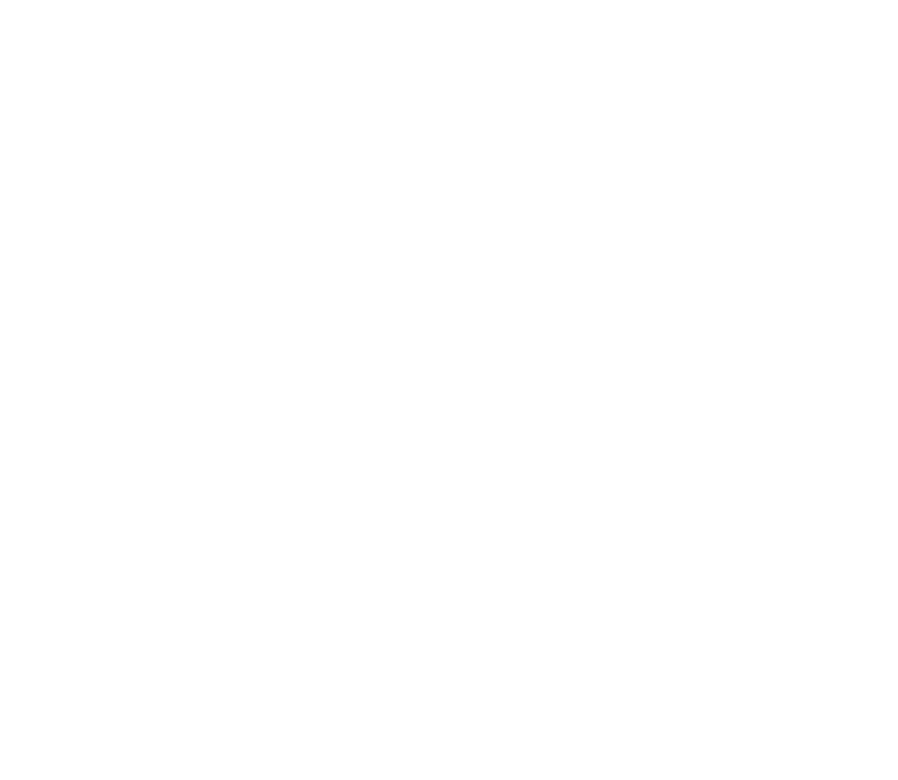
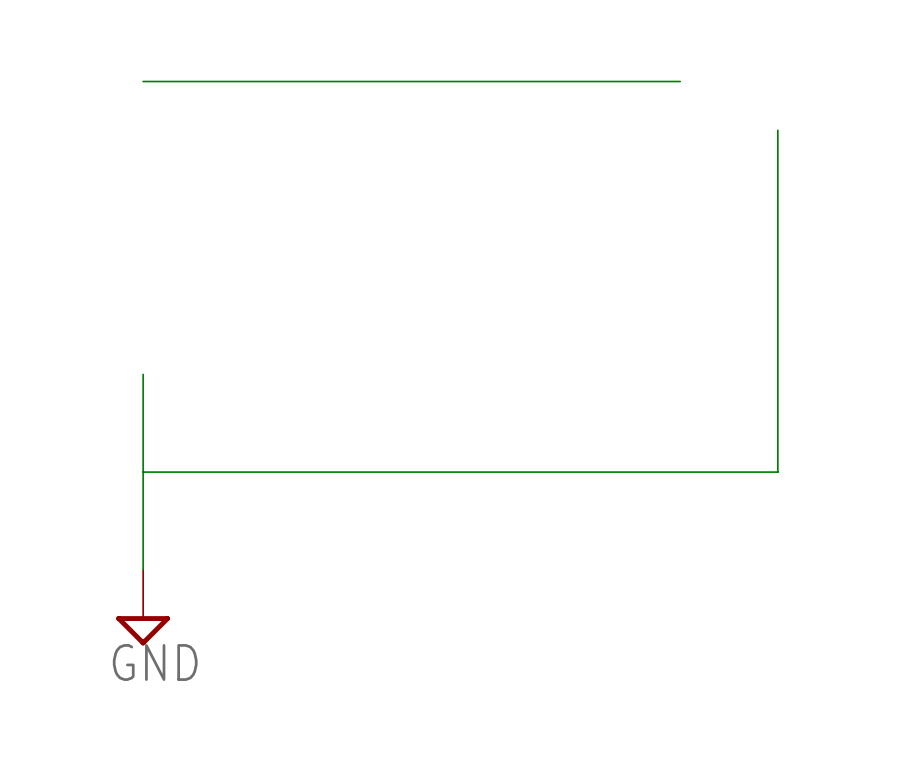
wire: none -> (143, 81) (680, 81)
wire: none -> (777, 130) (777, 472) (143, 472)
wire: none -> (143, 374) (143, 569)
power symbol: none -> GND (143, 607)

